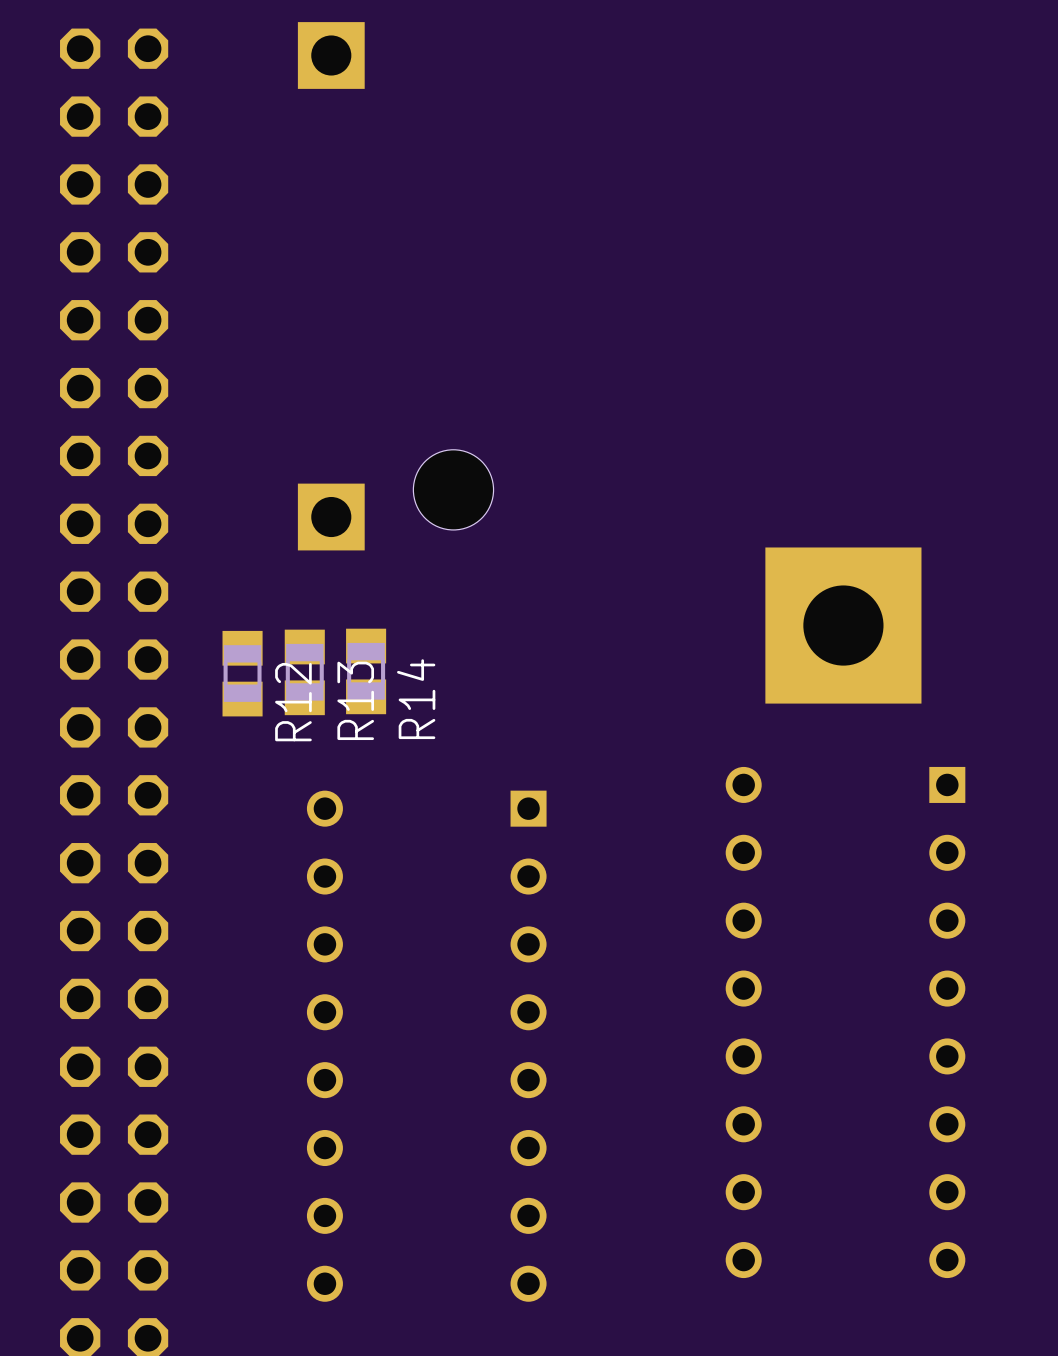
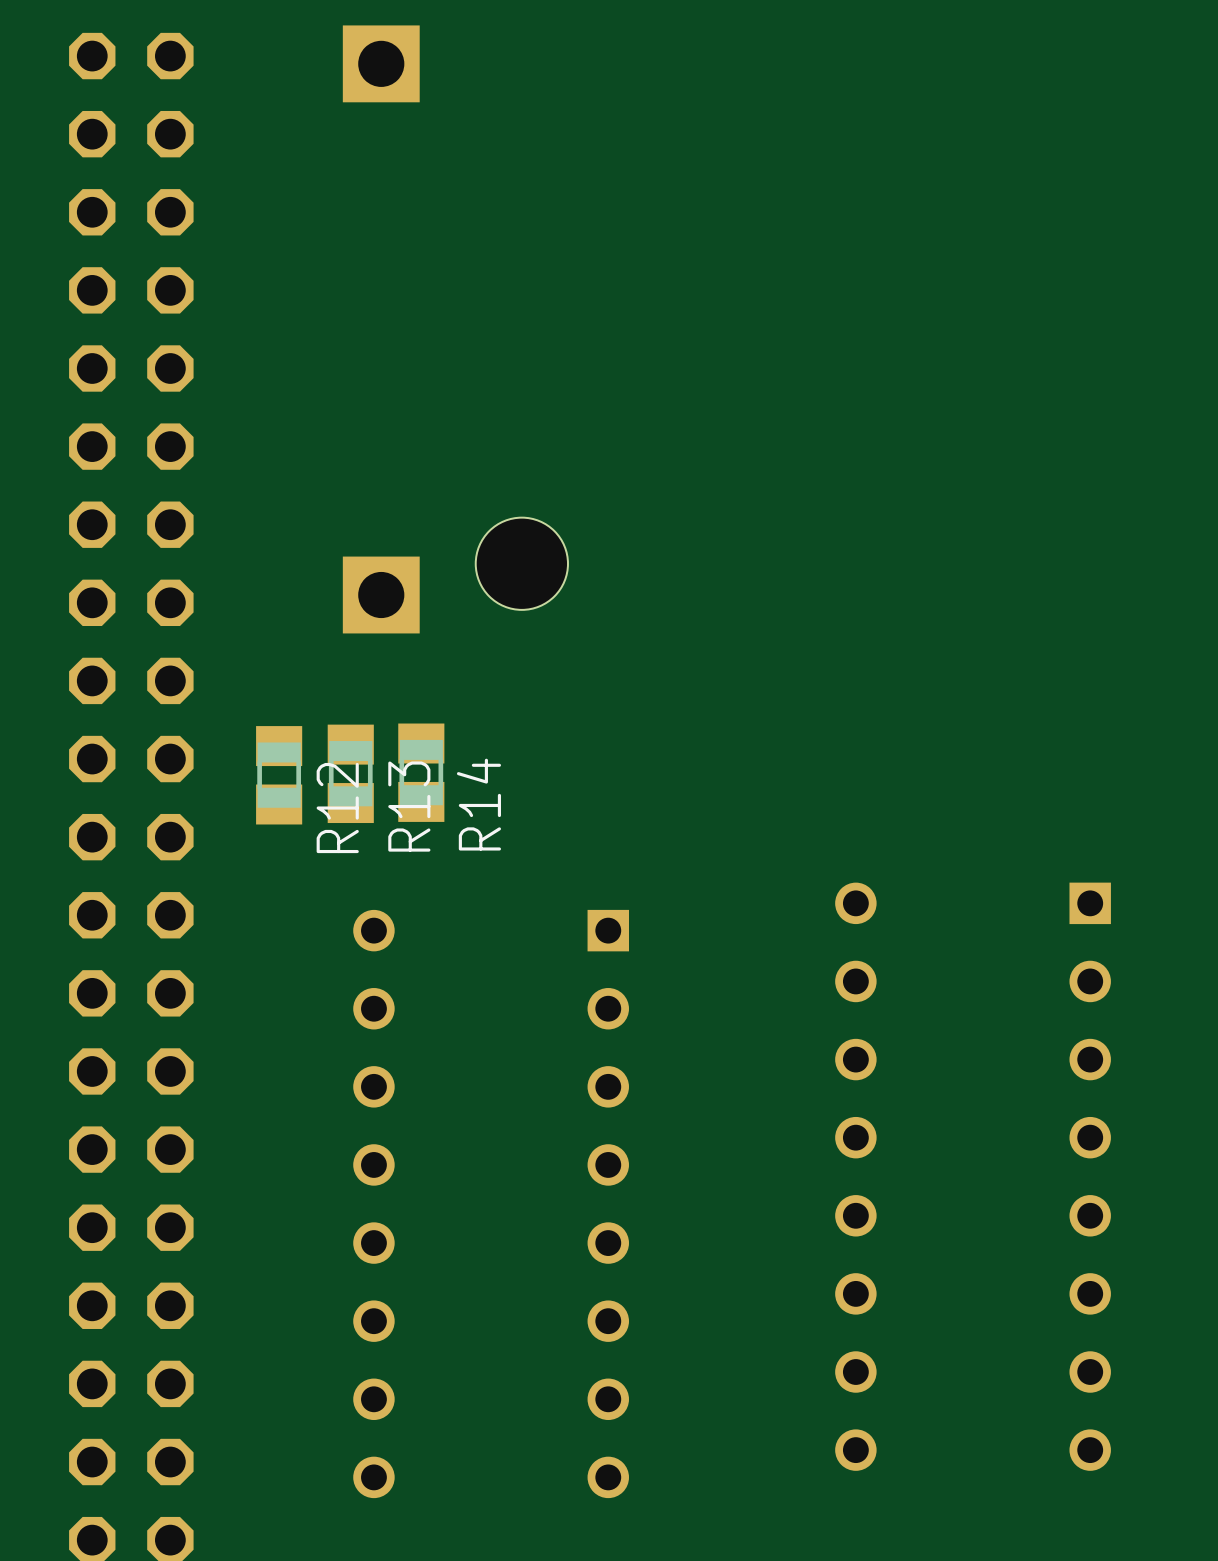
part: (843, 625) -> none

